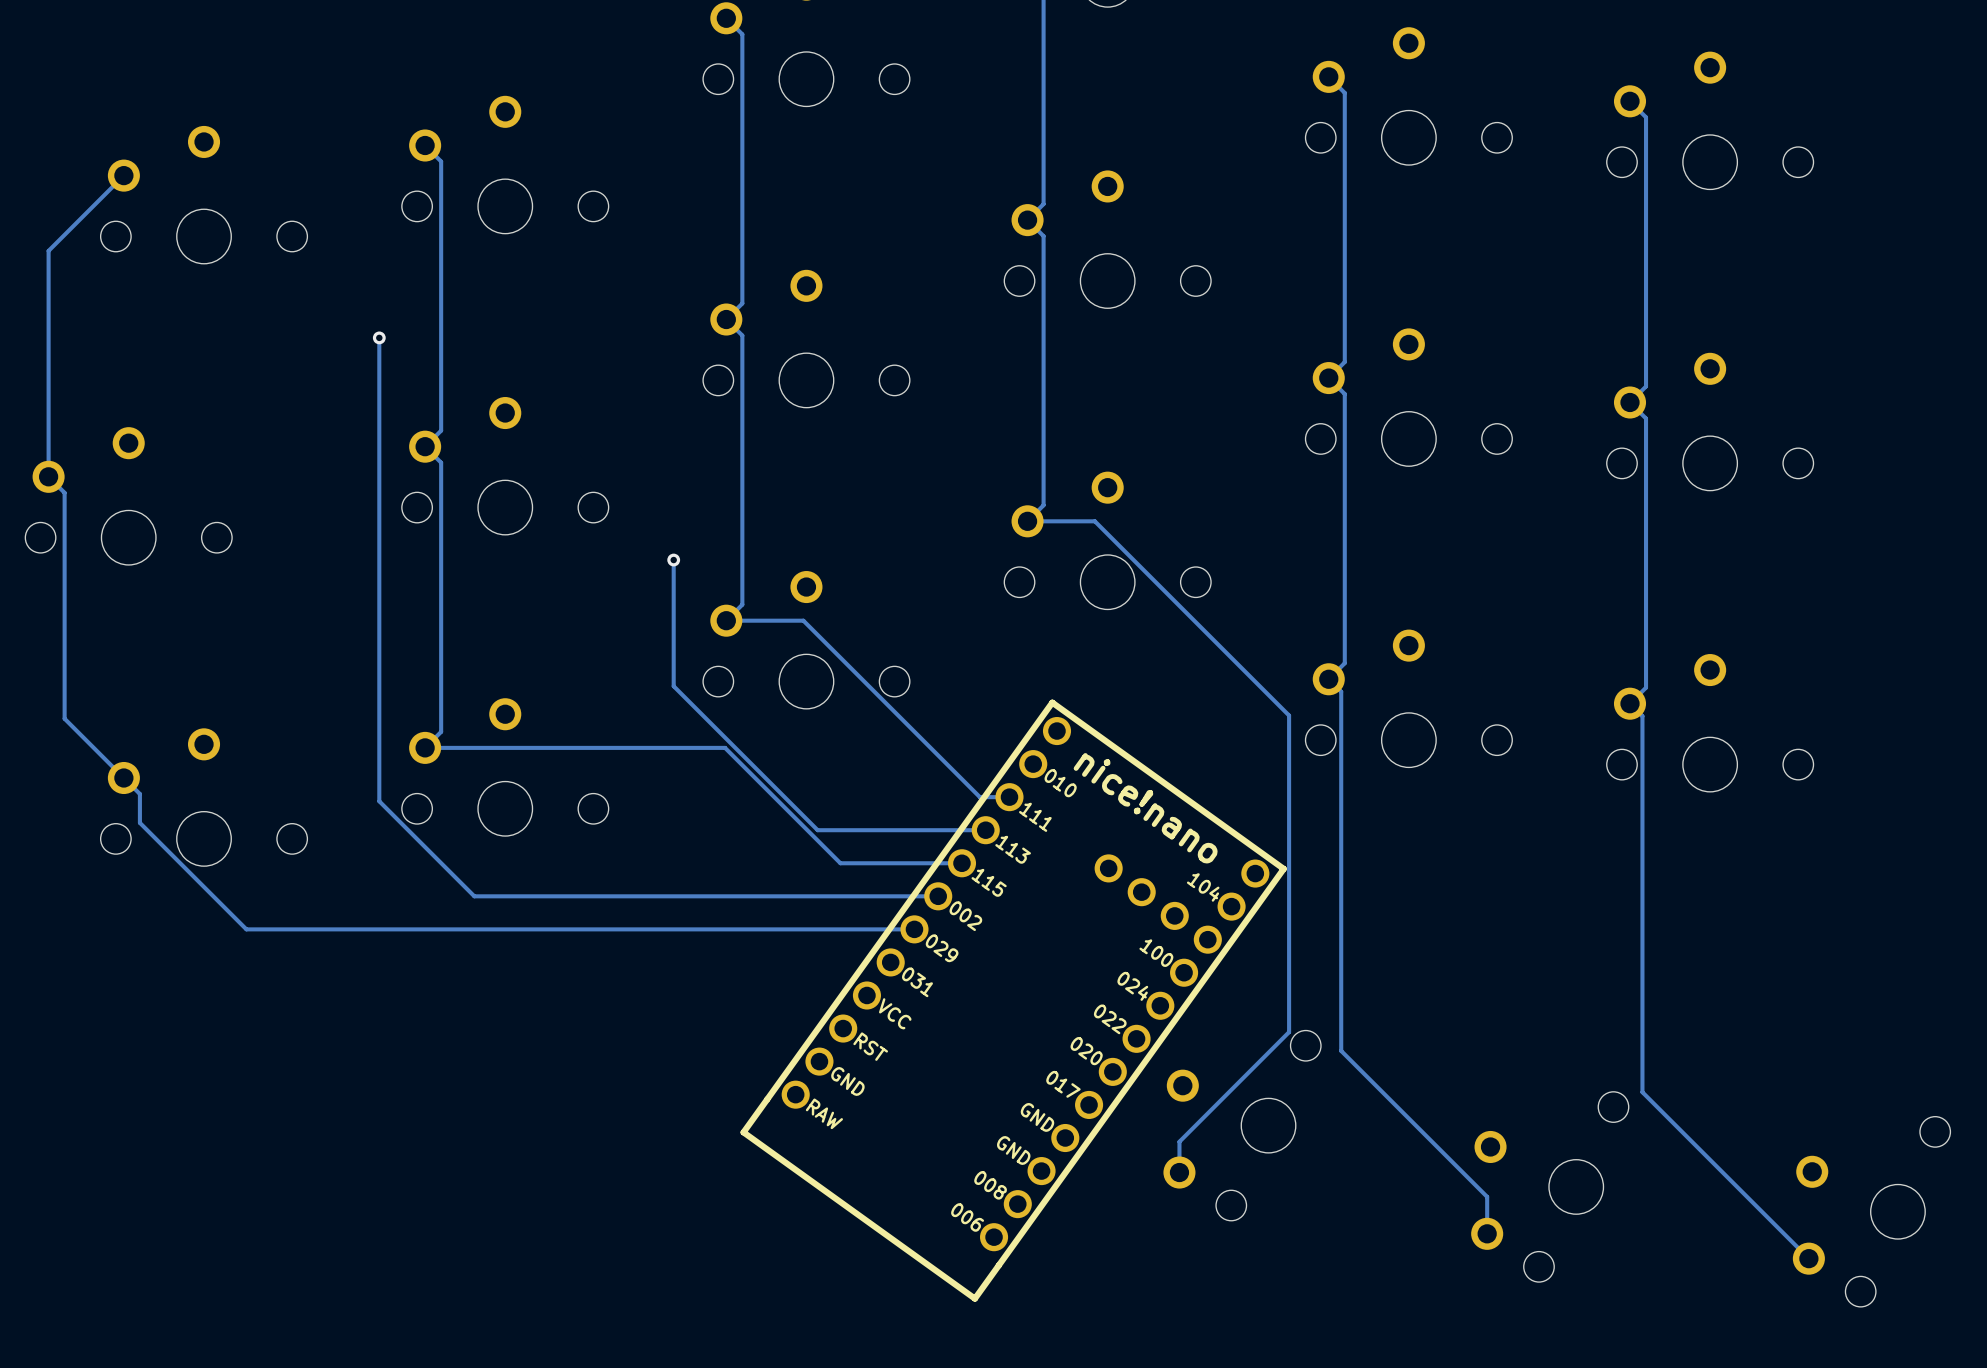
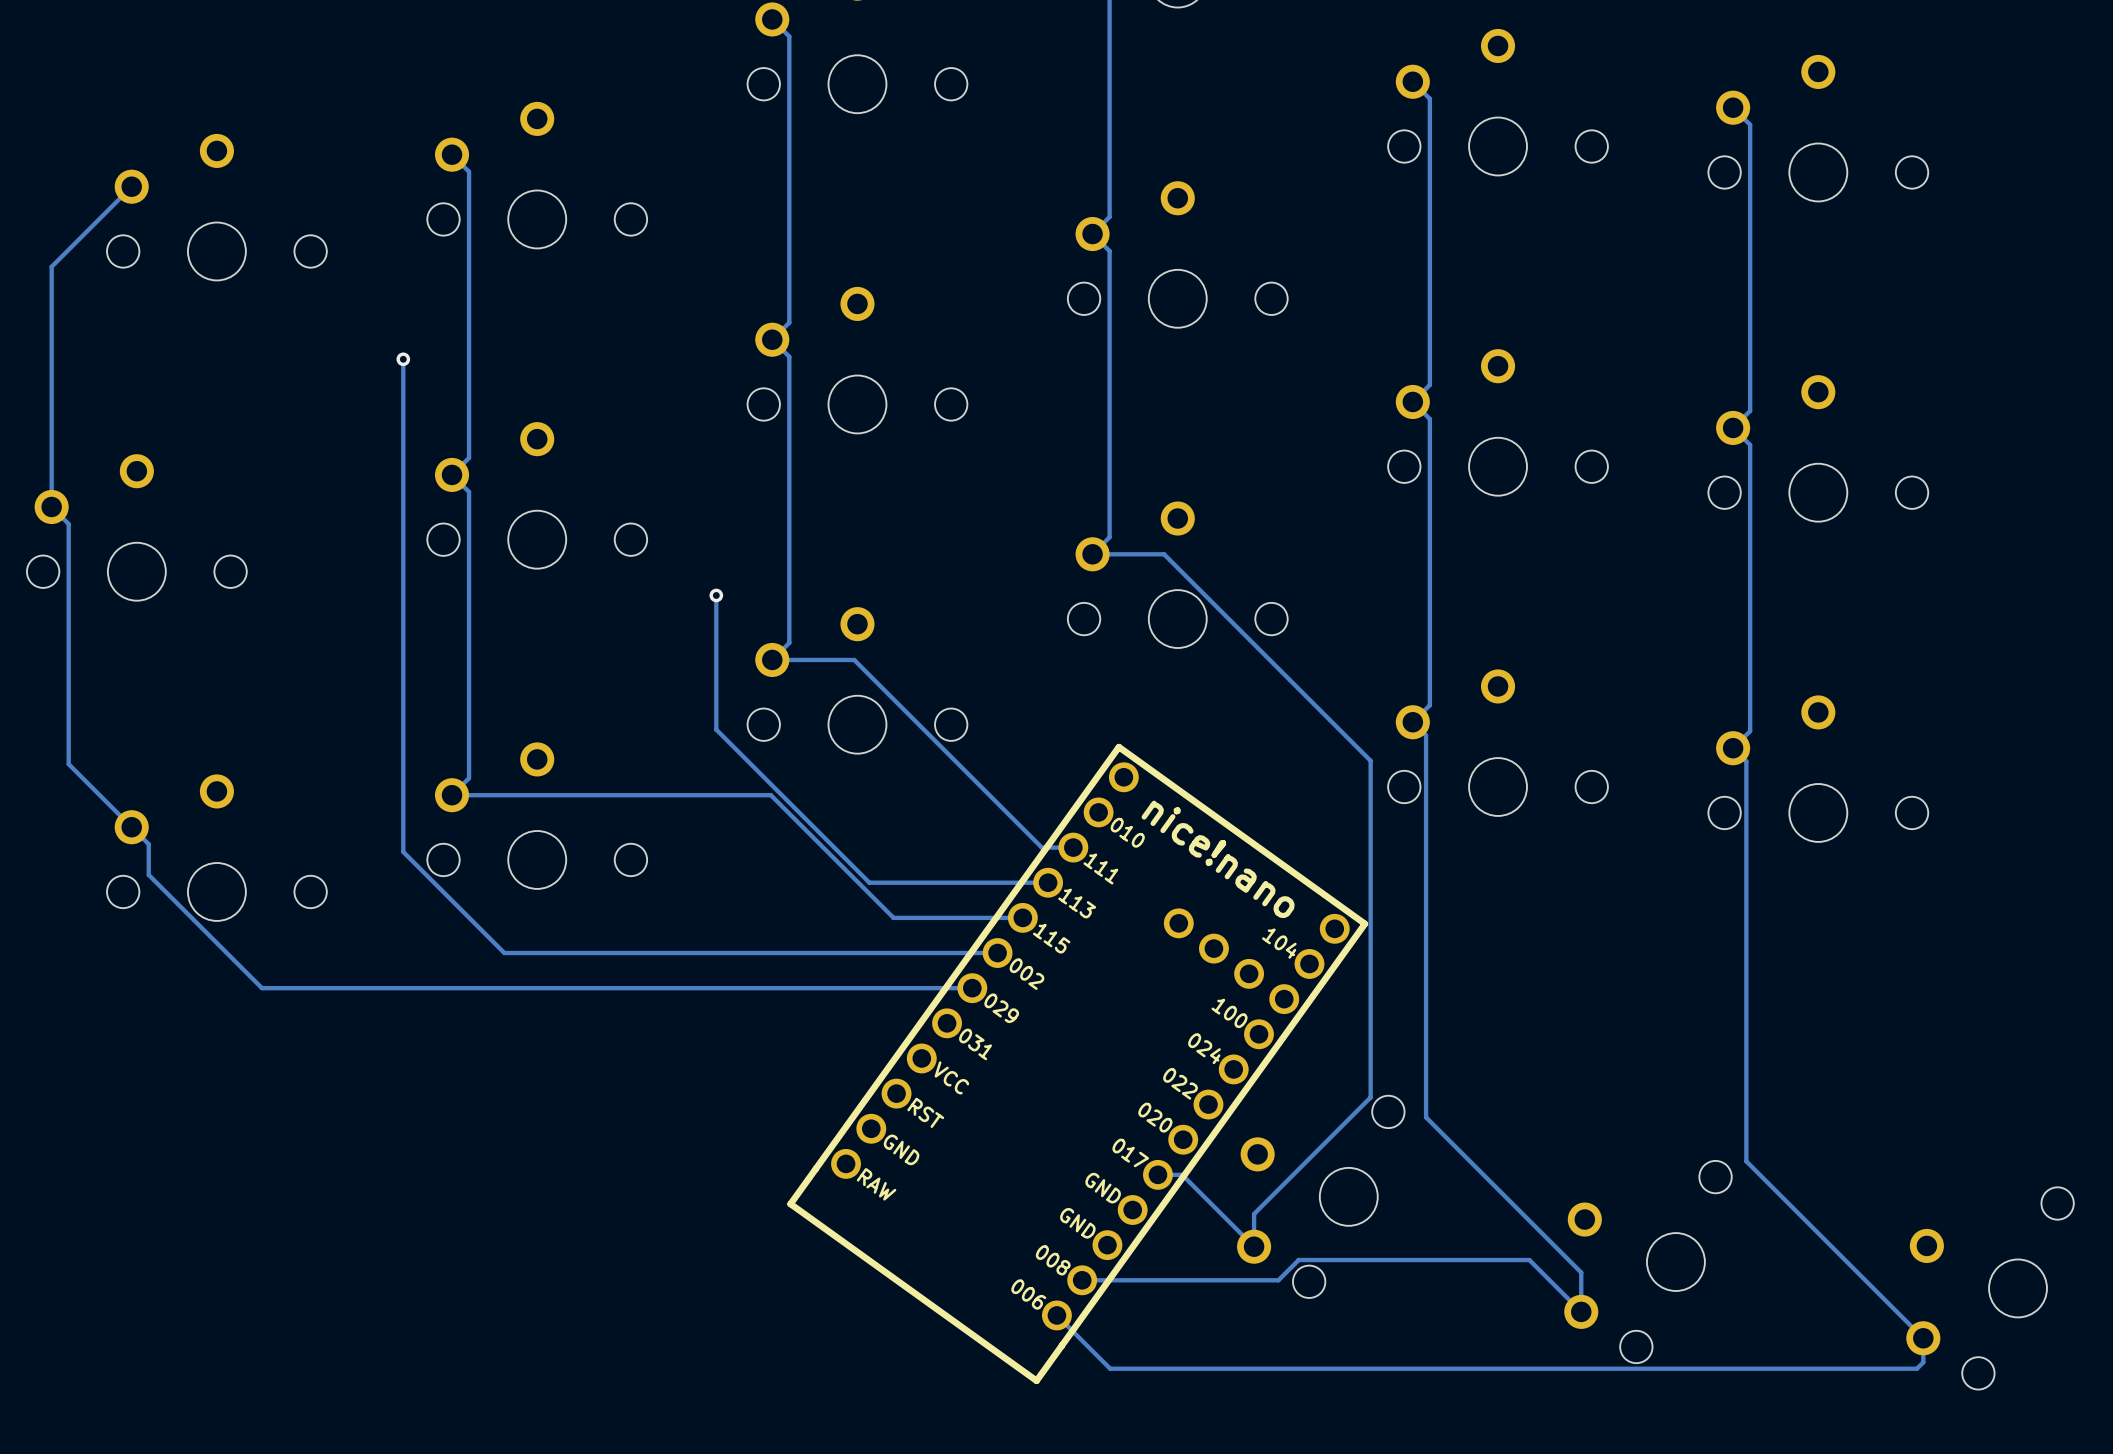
track: none -> (1157, 1174) (1182, 1174) (1254, 1246)
track: none -> (1082, 1280) (1278, 1280) (1298, 1260) (1529, 1260) (1581, 1311)
track: none -> (1056, 1315) (1110, 1368) (1916, 1368) (1923, 1362) (1923, 1338)

